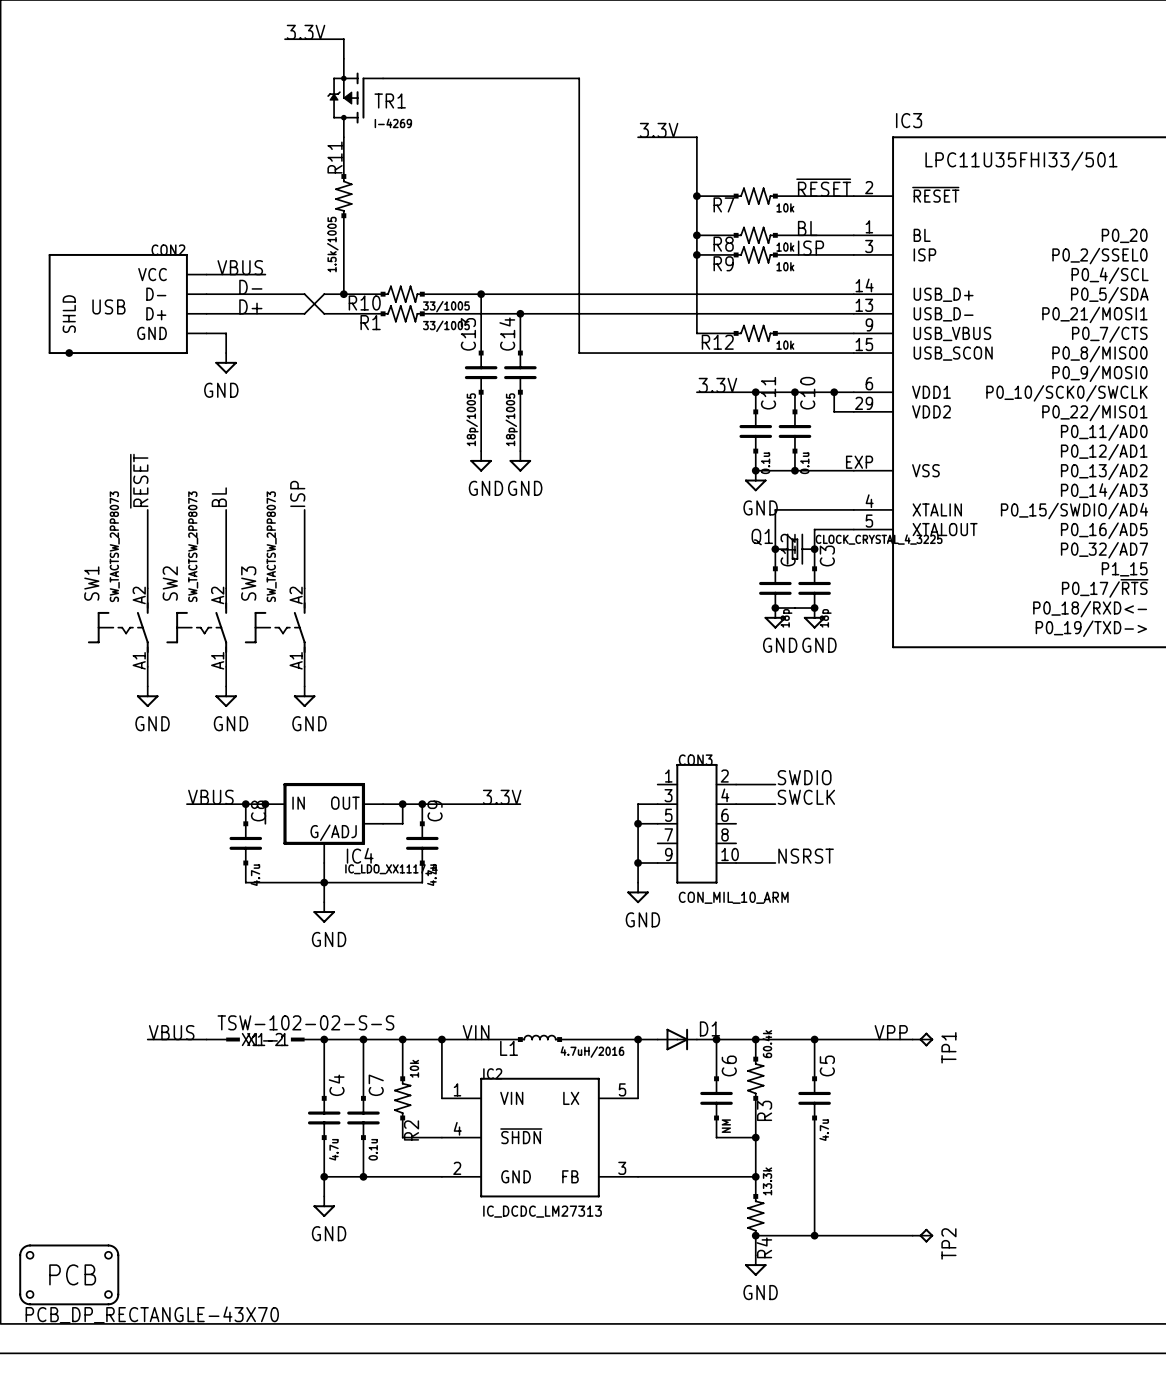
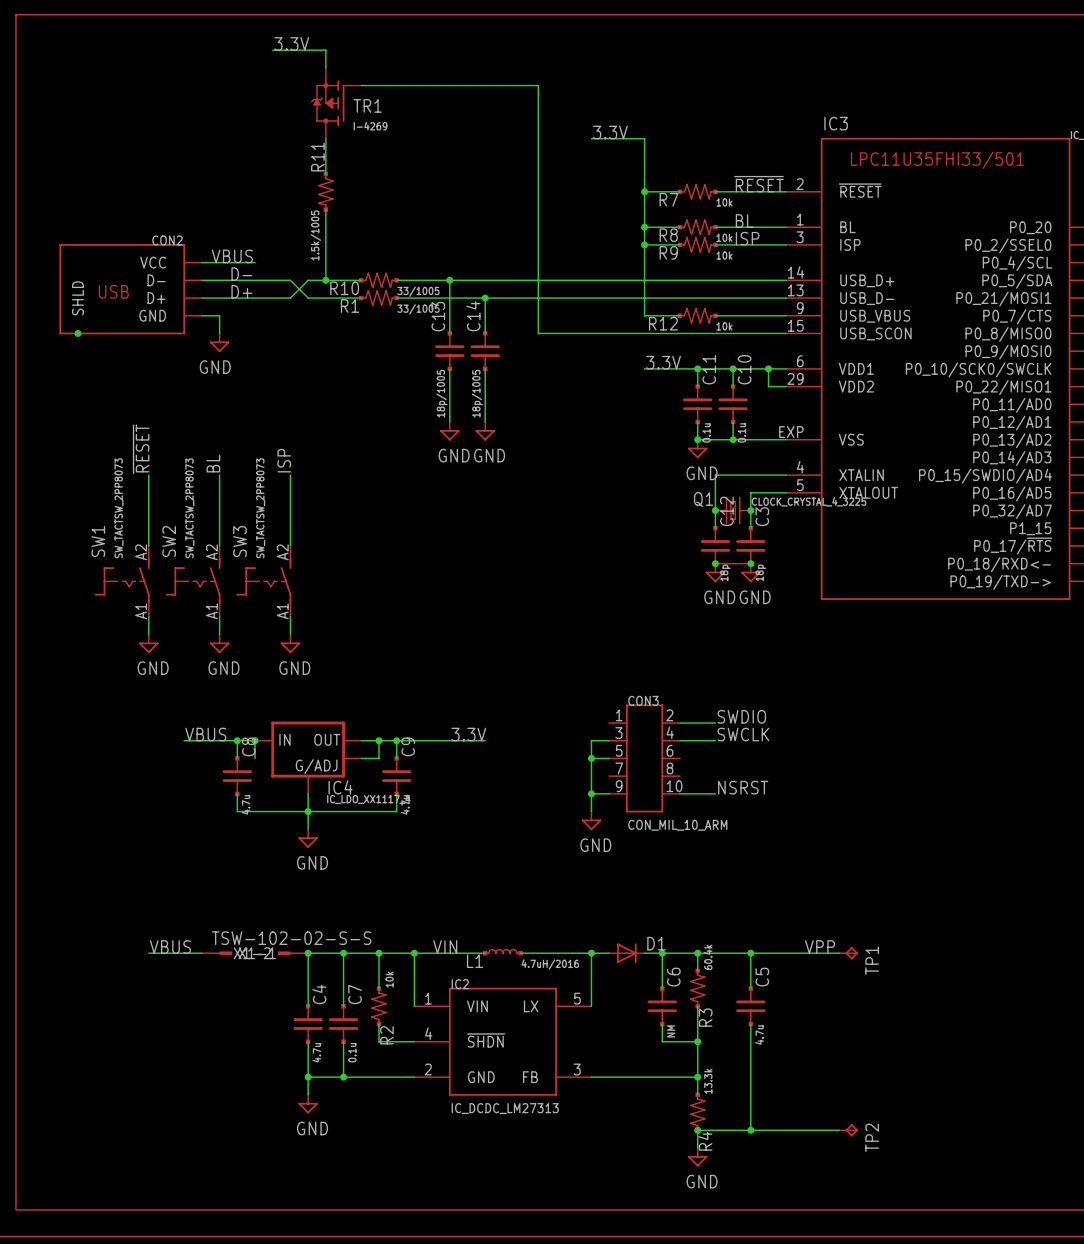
part: PCB_DP_RECTANGLE-43X70 (69, 1274) -> none

